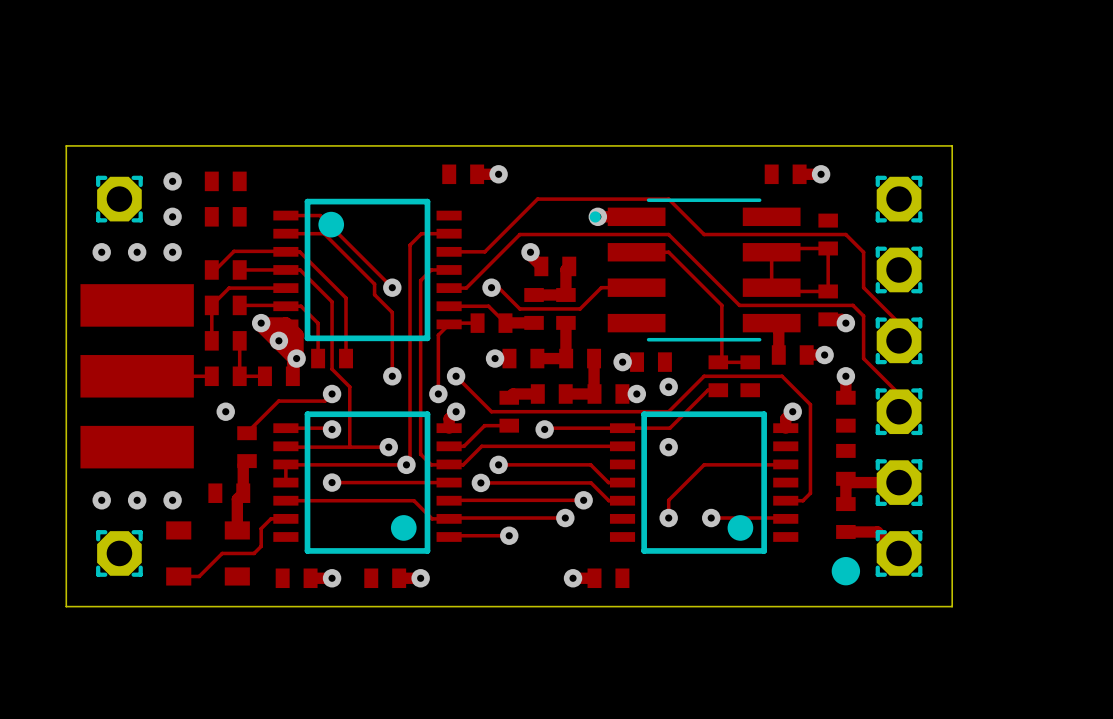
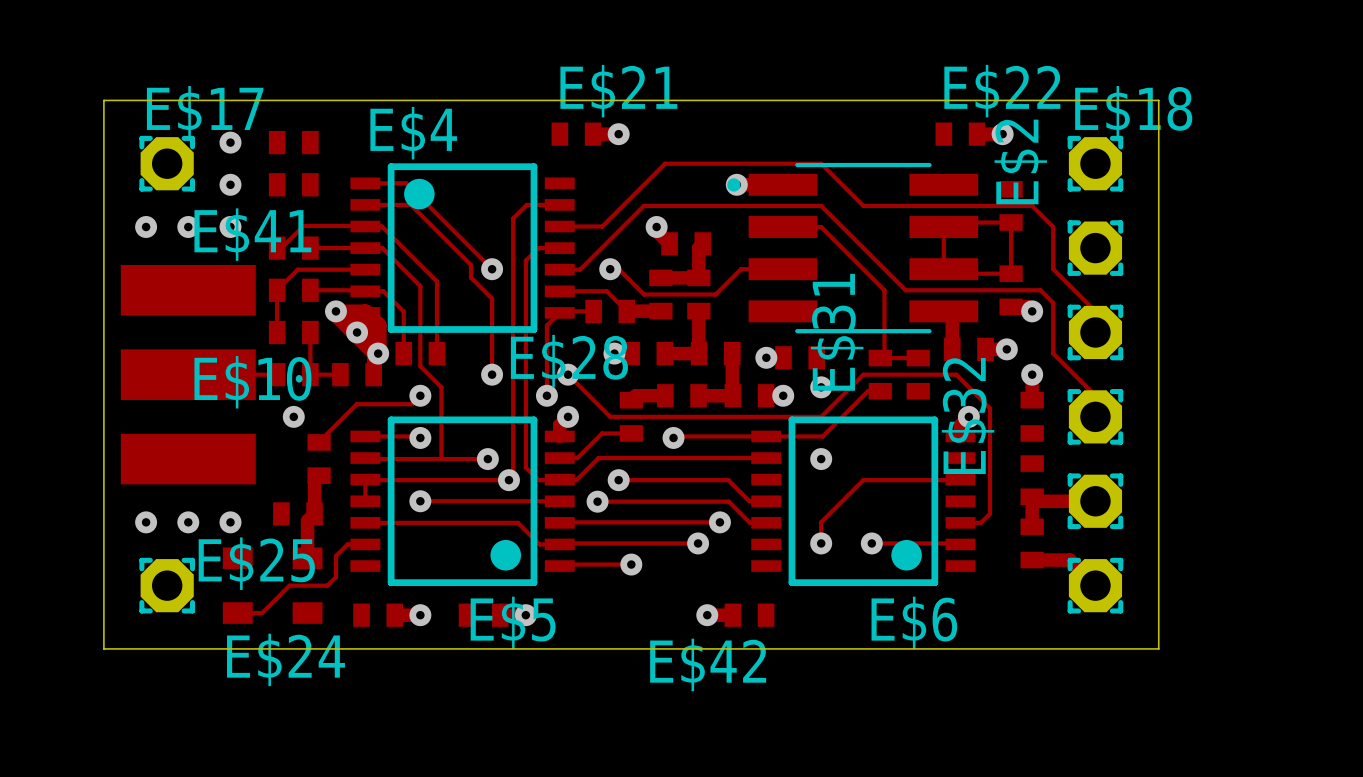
E$21 name: none -> E$21 (618, 91)
E$22 name: none -> E$22 (1002, 91)
E$17 name: none -> E$17 (205, 112)
E$18 name: none -> E$18 (1133, 112)
E$4 name: none -> E$4 (413, 133)
E$2 name: none -> E$2 (1020, 161)
E$41 name: none -> E$41 (252, 234)
E$31 name: none -> E$31 (837, 332)
E$28 name: none -> E$28 (569, 361)
E$10 name: none -> E$10 (252, 382)
E$32 name: none -> E$32 (968, 416)
E$25 name: none -> E$25 (256, 563)
drawing: [831, 557, 861, 586] -> none
E$5 name: none -> E$5 (513, 622)
E$6 name: none -> E$6 (914, 622)
E$24 name: none -> E$24 (285, 659)
E$42 name: none -> E$42 (708, 664)

